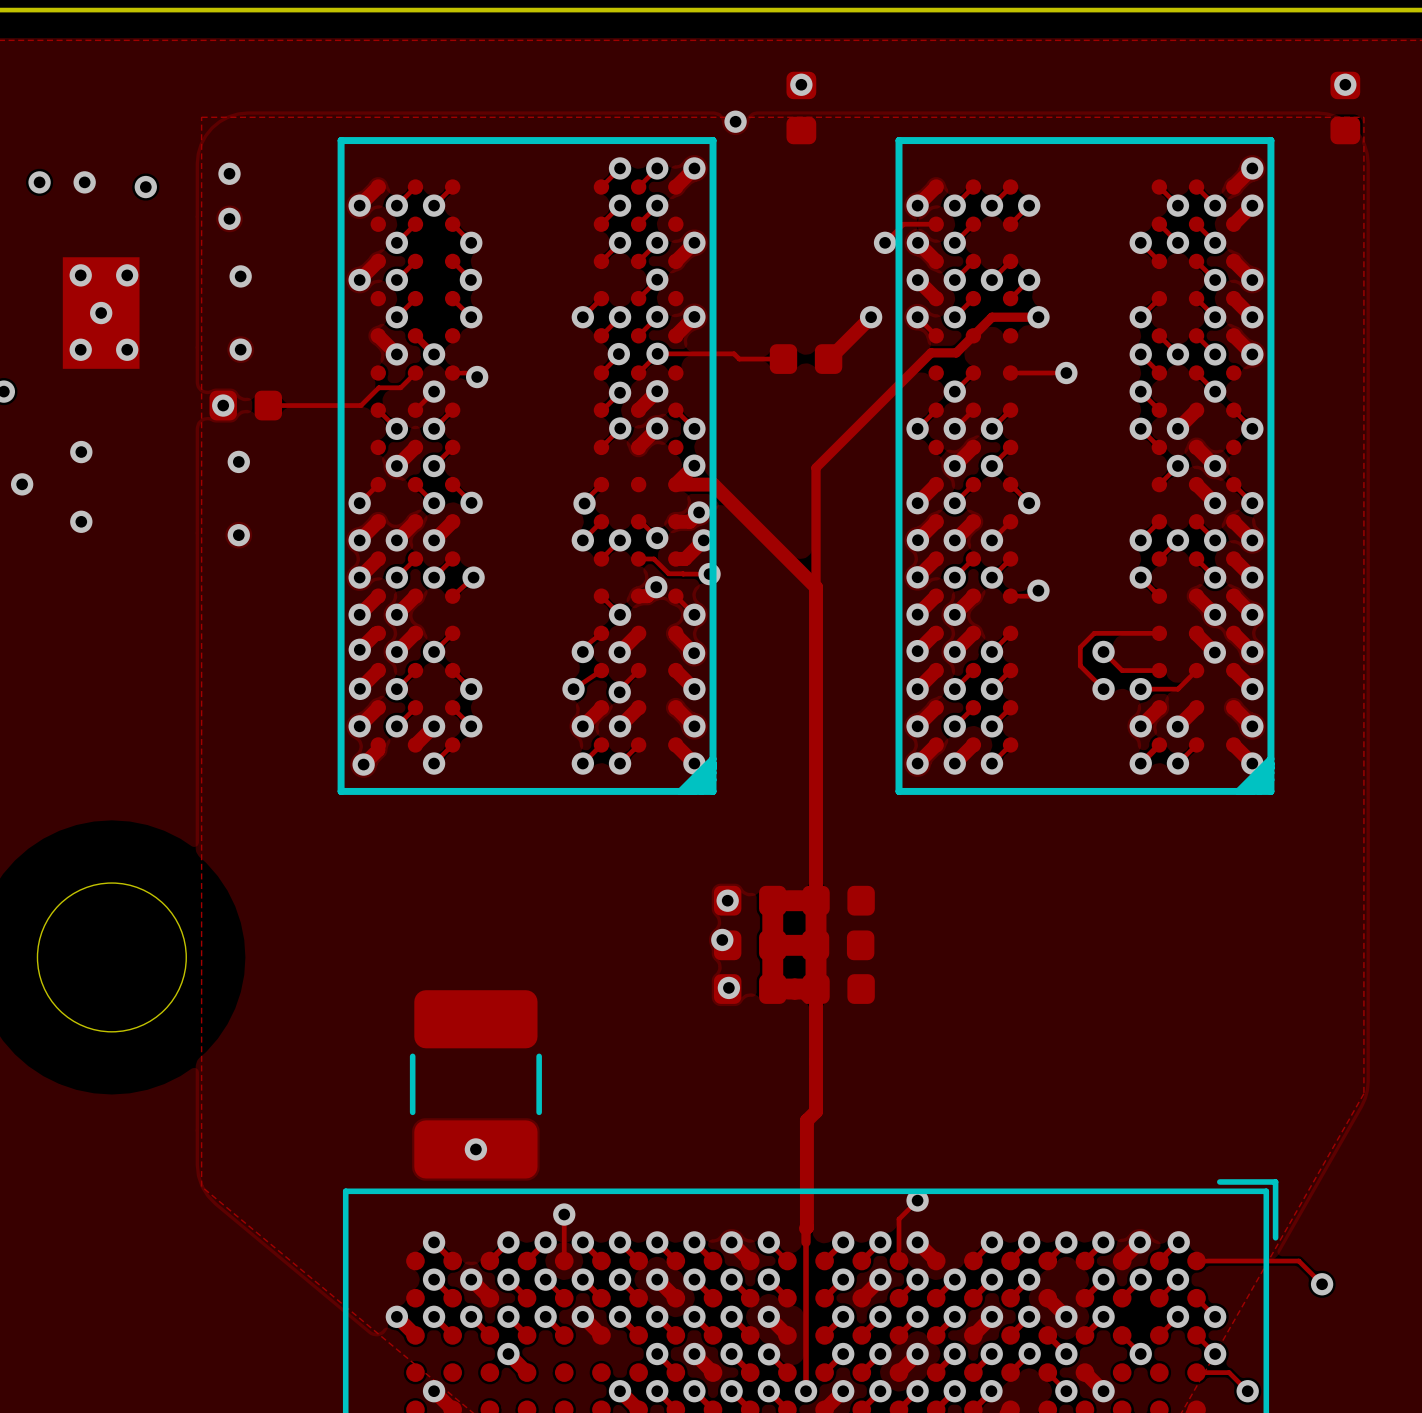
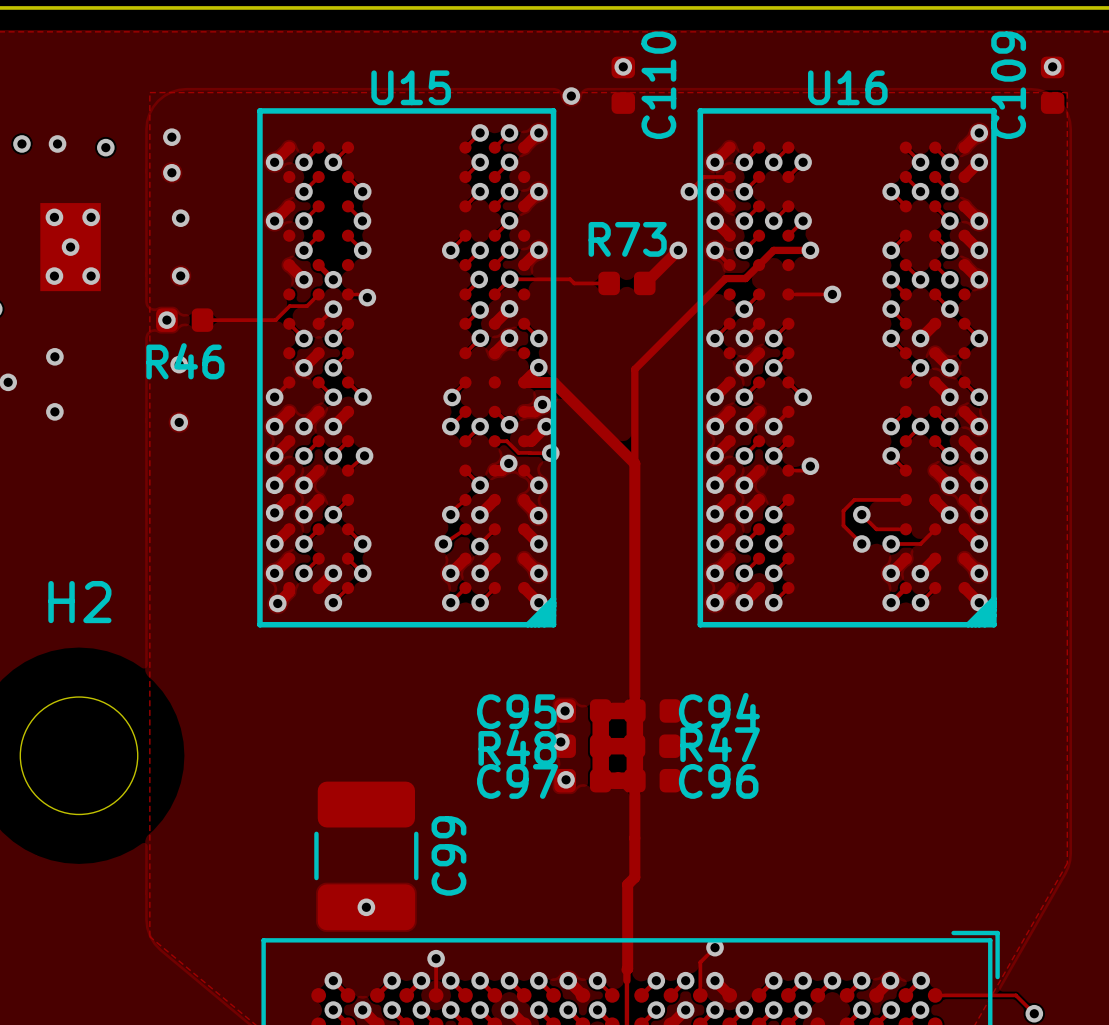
C110 name: none -> C110 (658, 85)
C109 name: none -> C109 (1008, 85)
U15 name: none -> U15 (411, 87)
U16 name: none -> U16 (847, 87)
R73 name: none -> R73 (627, 239)
R46 name: none -> R46 (185, 361)
H2 name: none -> H2 (79, 602)
C94 name: none -> C94 (719, 711)
C95 name: none -> C95 (516, 711)
R47 name: none -> R47 (720, 744)
R48 name: none -> R48 (517, 747)
C97 name: none -> C97 (517, 781)
C96 name: none -> C96 (718, 781)
C99 name: none -> C99 (448, 855)

